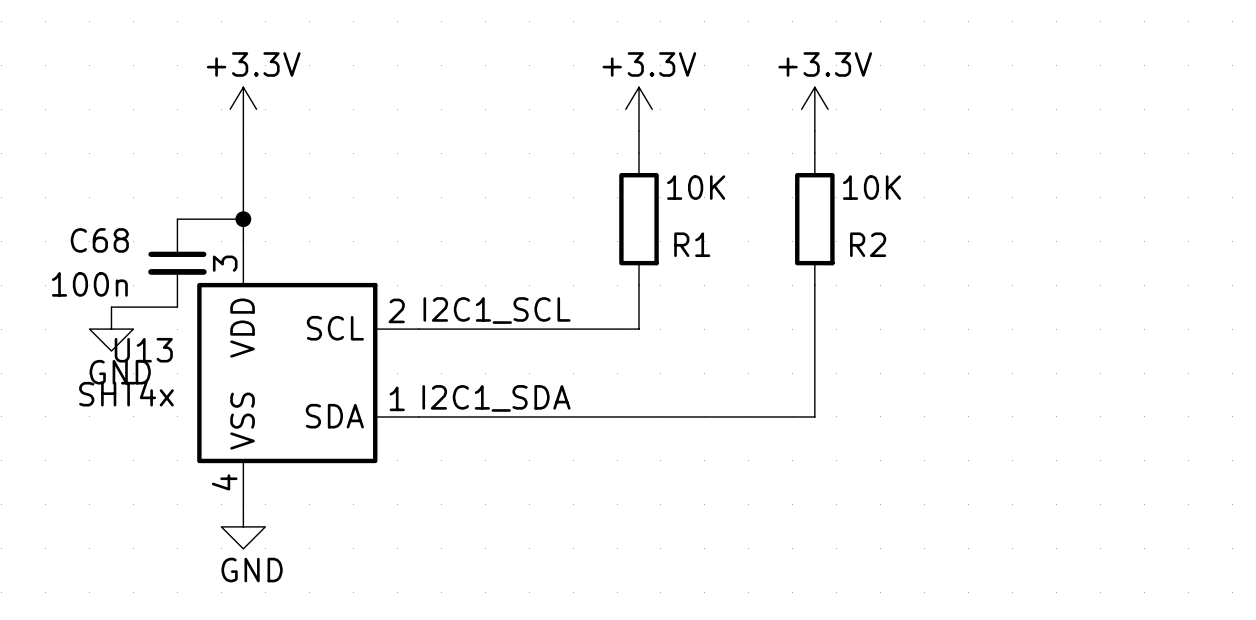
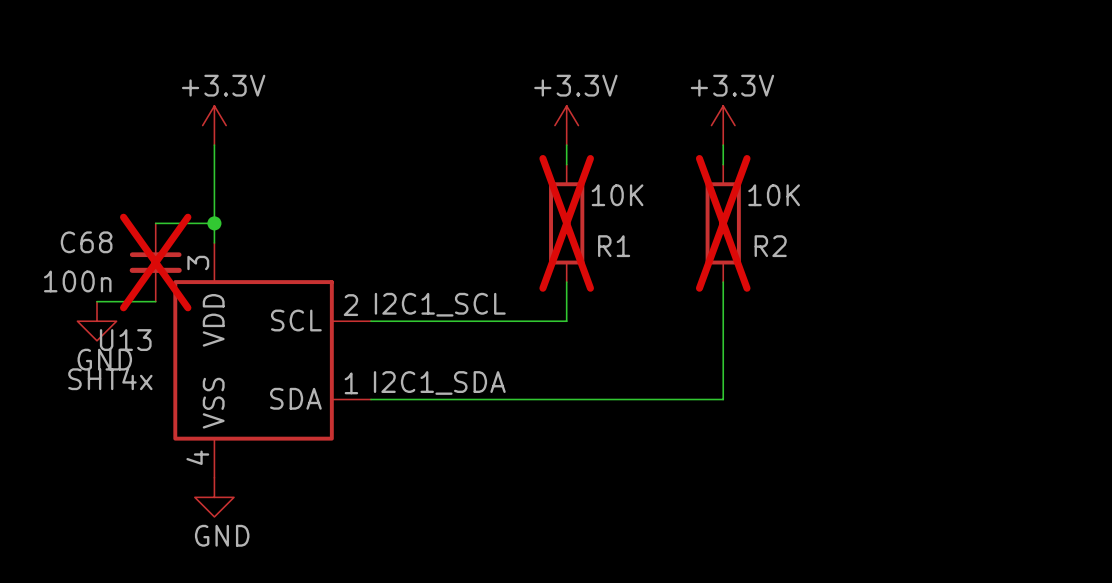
R1 do-not-place cross: none -> (566, 223)
R2 do-not-place cross: none -> (723, 223)
C68 do-not-place cross: none -> (155, 262)

